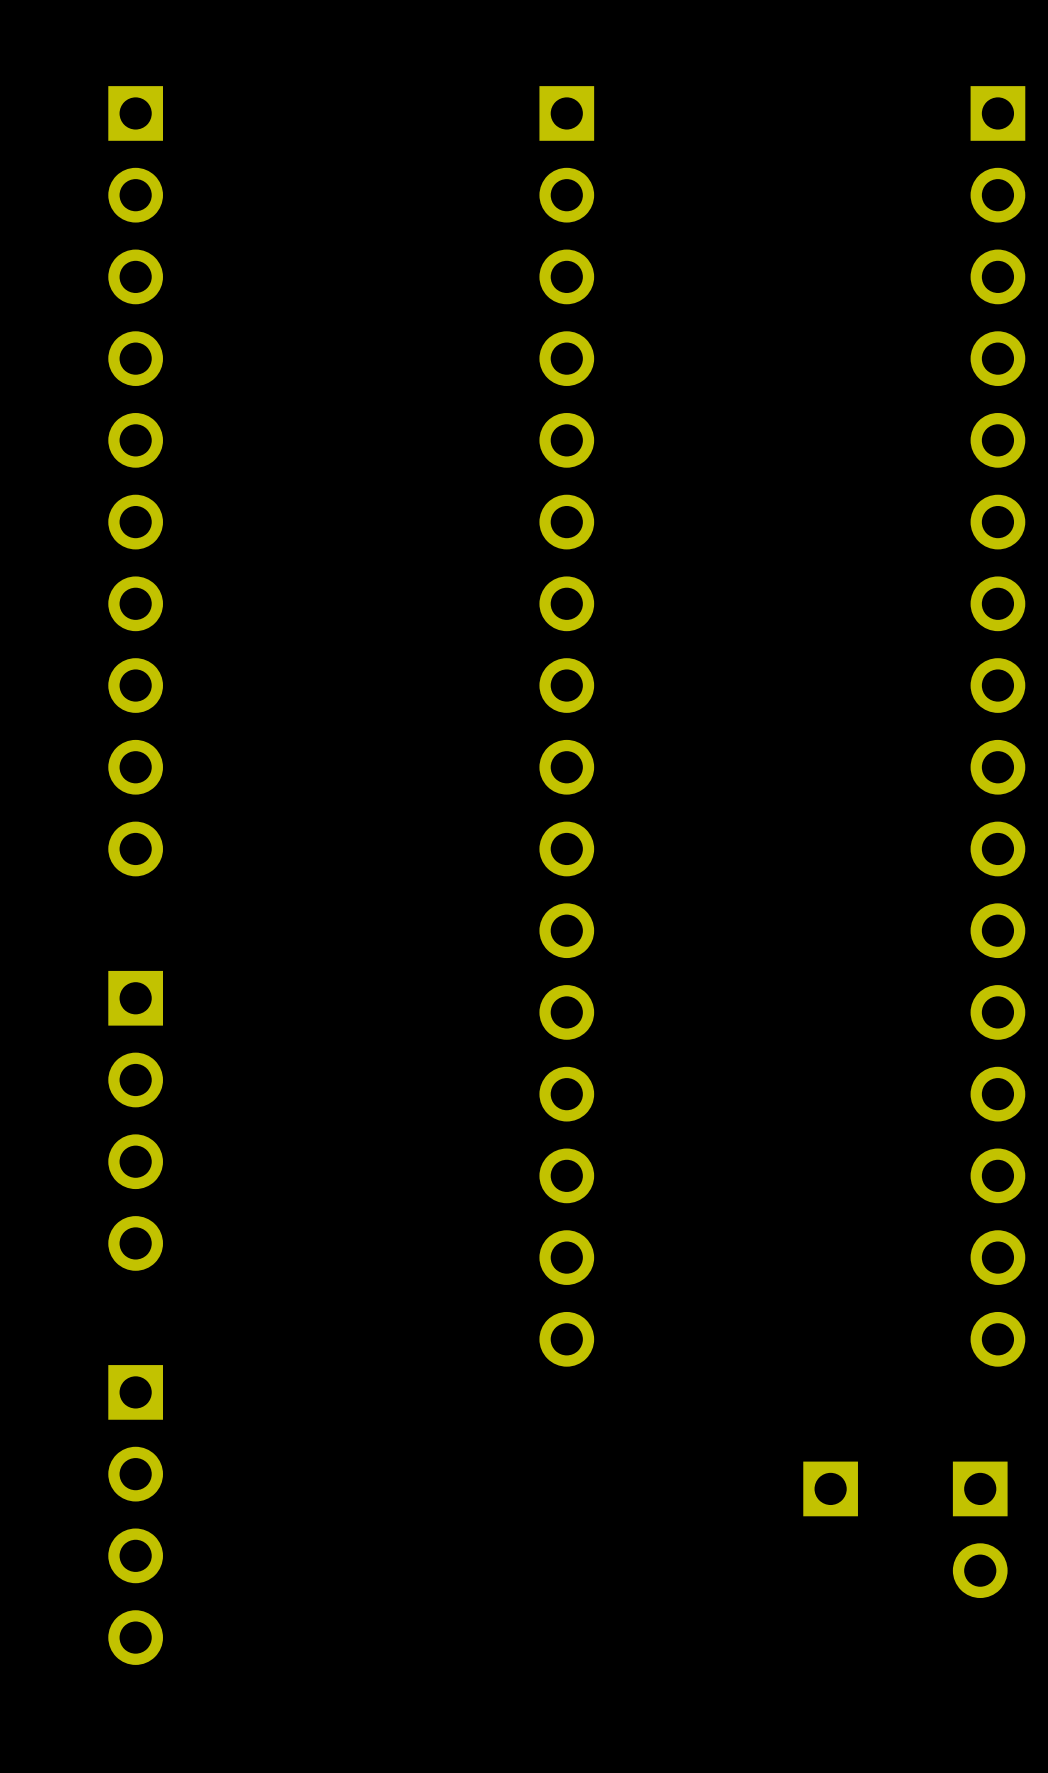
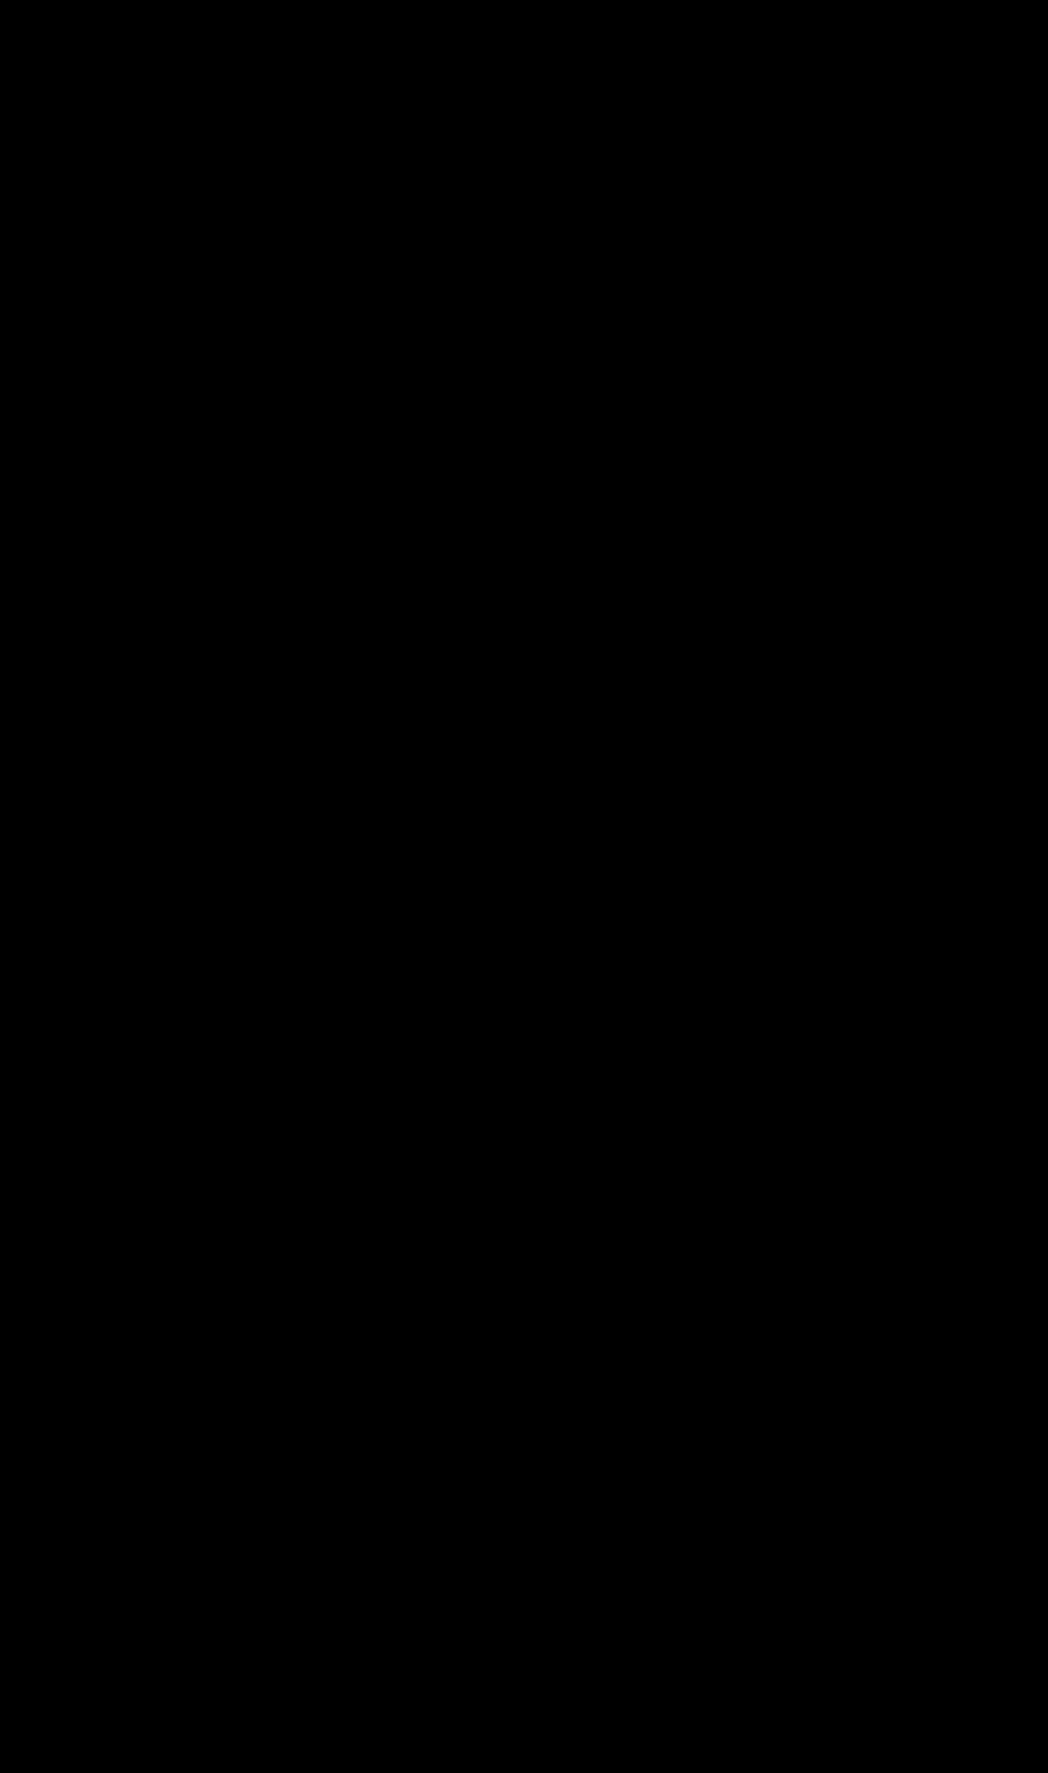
part: (135, 481) -> none
part: (566, 726) -> none
part: (997, 726) -> none
part: (135, 1120) -> none
part: (830, 1488) -> none
part: (135, 1515) -> none
part: (980, 1529) -> none

